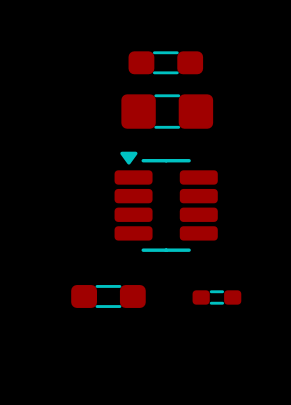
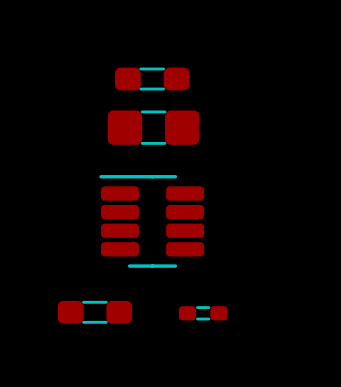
part footprint: [114, 151, 218, 252] -> [99, 175, 205, 268]

